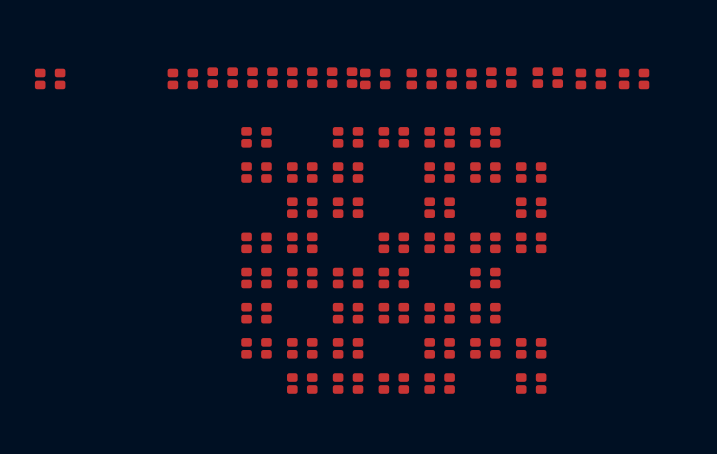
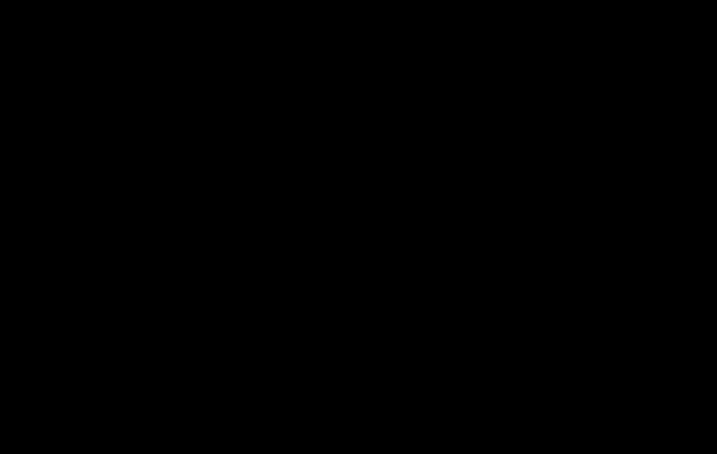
part: (222, 77) -> none
part: (262, 77) -> none
part: (302, 77) -> none
part: (342, 77) -> none
part: (501, 77) -> none
part: (547, 77) -> none
part: (50, 78) -> none
part: (182, 78) -> none
part: (375, 78) -> none
part: (421, 78) -> none
part: (461, 78) -> none
part: (590, 78) -> none
part: (634, 78) -> none
part: (256, 137) -> none
part: (348, 137) -> none
part: (393, 137) -> none
part: (439, 137) -> none
part: (485, 137) -> none
part: (256, 172) -> none
part: (302, 172) -> none
part: (348, 172) -> none
part: (439, 172) -> none
part: (485, 172) -> none
part: (531, 172) -> none
part: (302, 207) -> none
part: (348, 207) -> none
part: (439, 207) -> none
part: (531, 207) -> none
part: (256, 242) -> none
part: (302, 242) -> none
part: (393, 242) -> none
part: (439, 242) -> none
part: (485, 242) -> none
part: (531, 242) -> none
part: (256, 278) -> none
part: (302, 278) -> none
part: (348, 278) -> none
part: (393, 278) -> none
part: (485, 278) -> none
part: (256, 313) -> none
part: (348, 313) -> none
part: (393, 313) -> none
part: (439, 313) -> none
part: (485, 313) -> none
part: (256, 348) -> none
part: (302, 348) -> none
part: (348, 348) -> none
part: (439, 348) -> none
part: (485, 348) -> none
part: (531, 348) -> none
part: (302, 383) -> none
part: (348, 383) -> none
part: (393, 383) -> none
part: (439, 383) -> none
part: (531, 383) -> none

